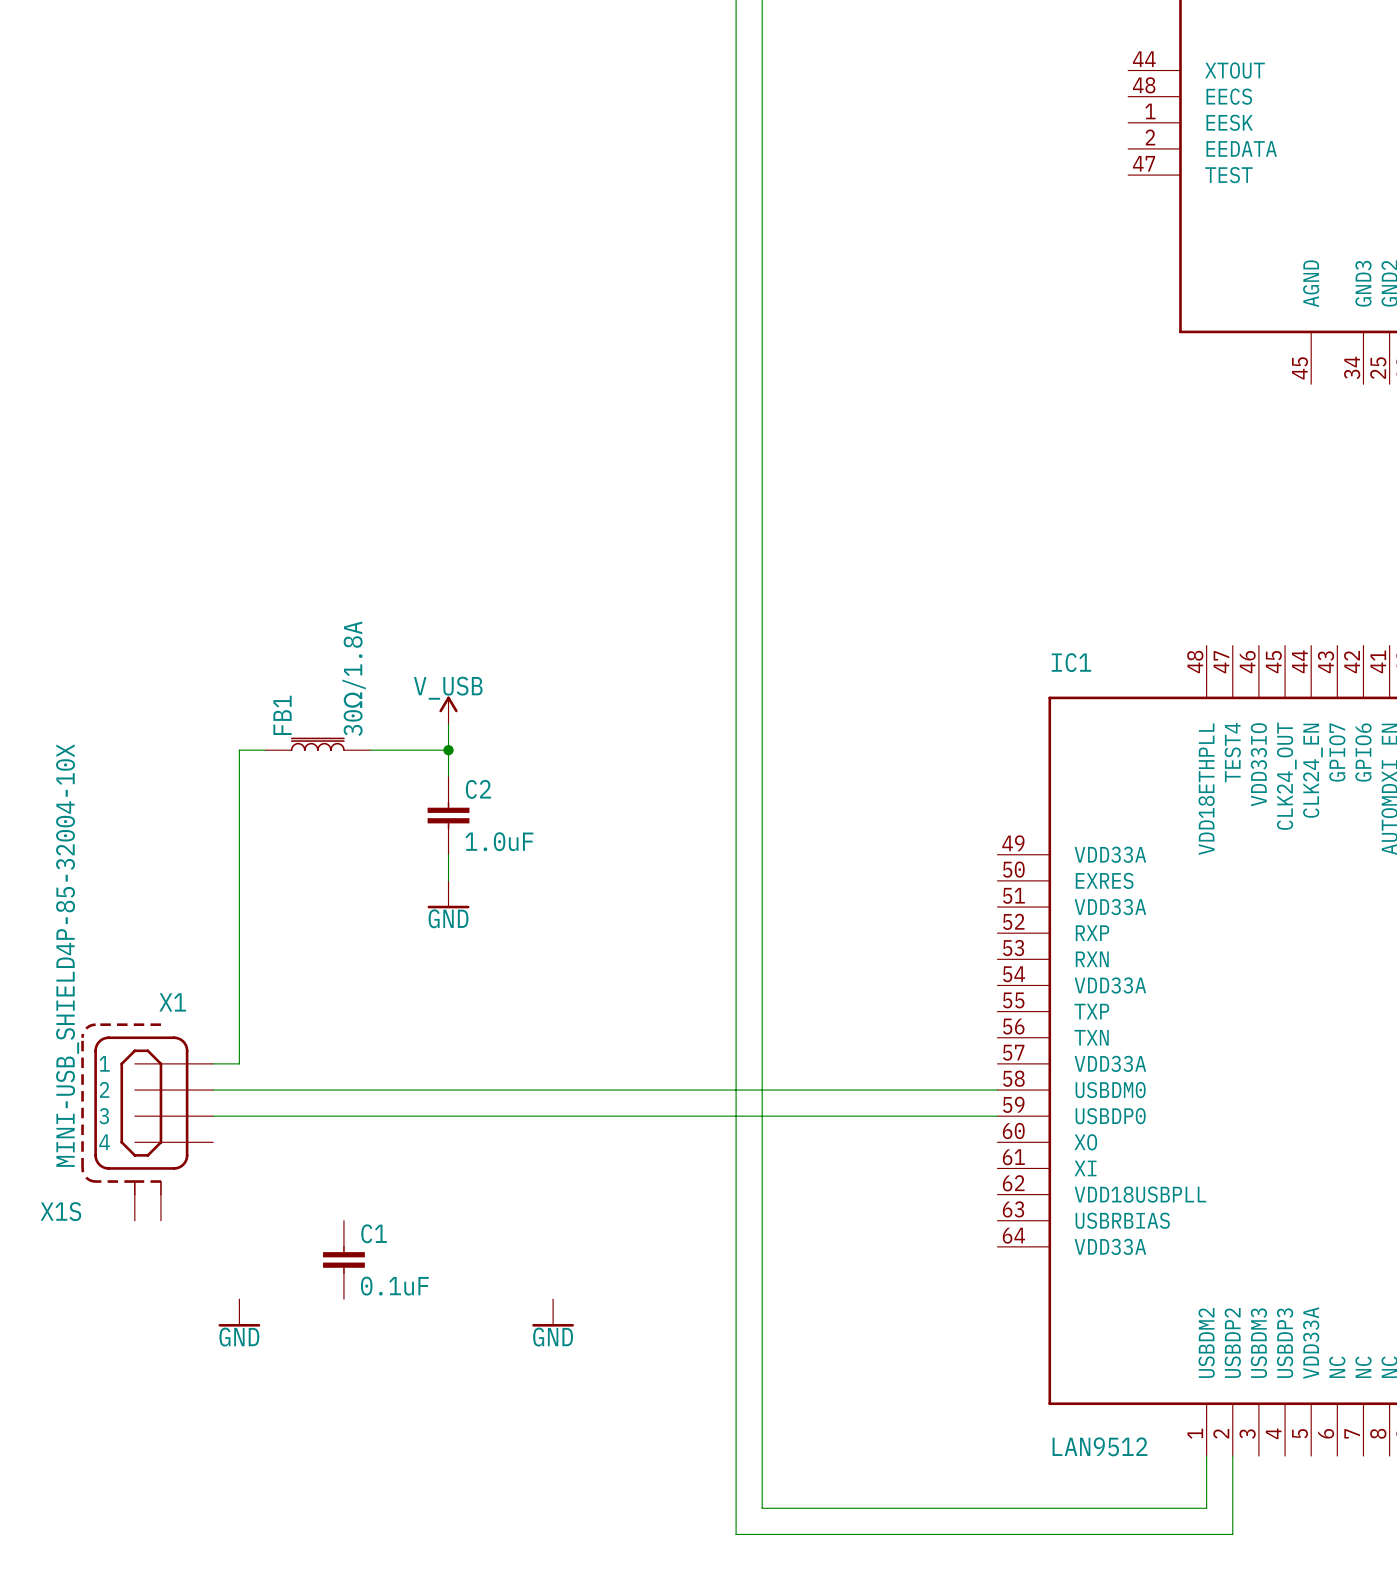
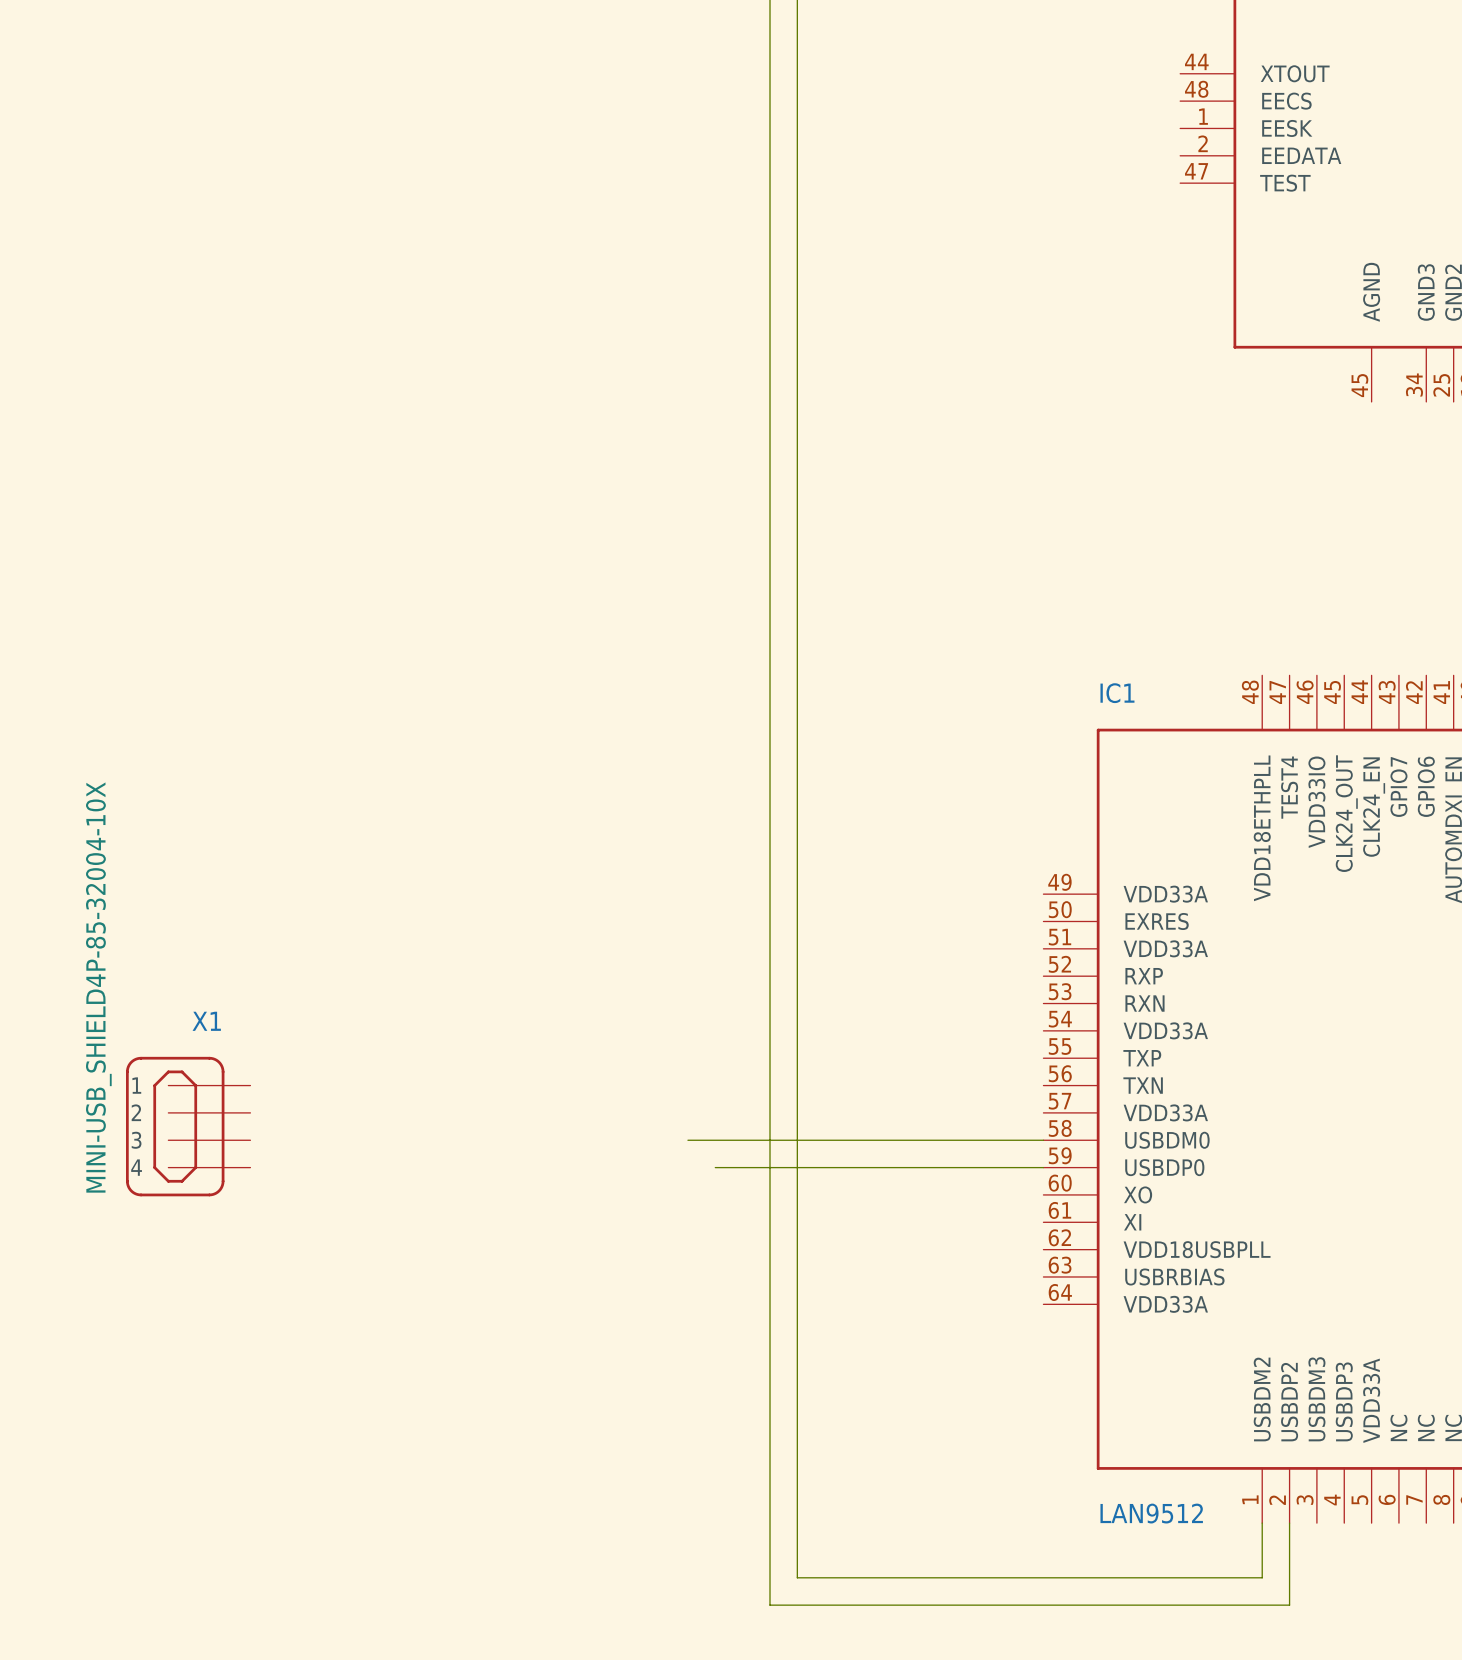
power symbol: V_USB (448, 710) -> none
wire: (448, 724) (448, 776) -> none
FB1: 30Ω/1.8A (317, 744) -> none
wire: (265, 750) (239, 750) (239, 1063) (213, 1063) -> none
wire: (370, 750) (448, 750) -> none
junction: (448, 750) -> none
C2: 1.0uF (448, 815) -> none
wire: (448, 854) (448, 880) -> none
power symbol: GND (448, 894) -> none
wire: (213, 1090) (657, 1090) -> none
X1 position: (153, 1103) -> (188, 1126)
wire: (213, 1116) (683, 1116) -> none
X1S: (121, 1122) -> none
C1: 0.1uF (343, 1259) -> none
power symbol: GND (239, 1312) -> none
power symbol: GND (553, 1312) -> none

